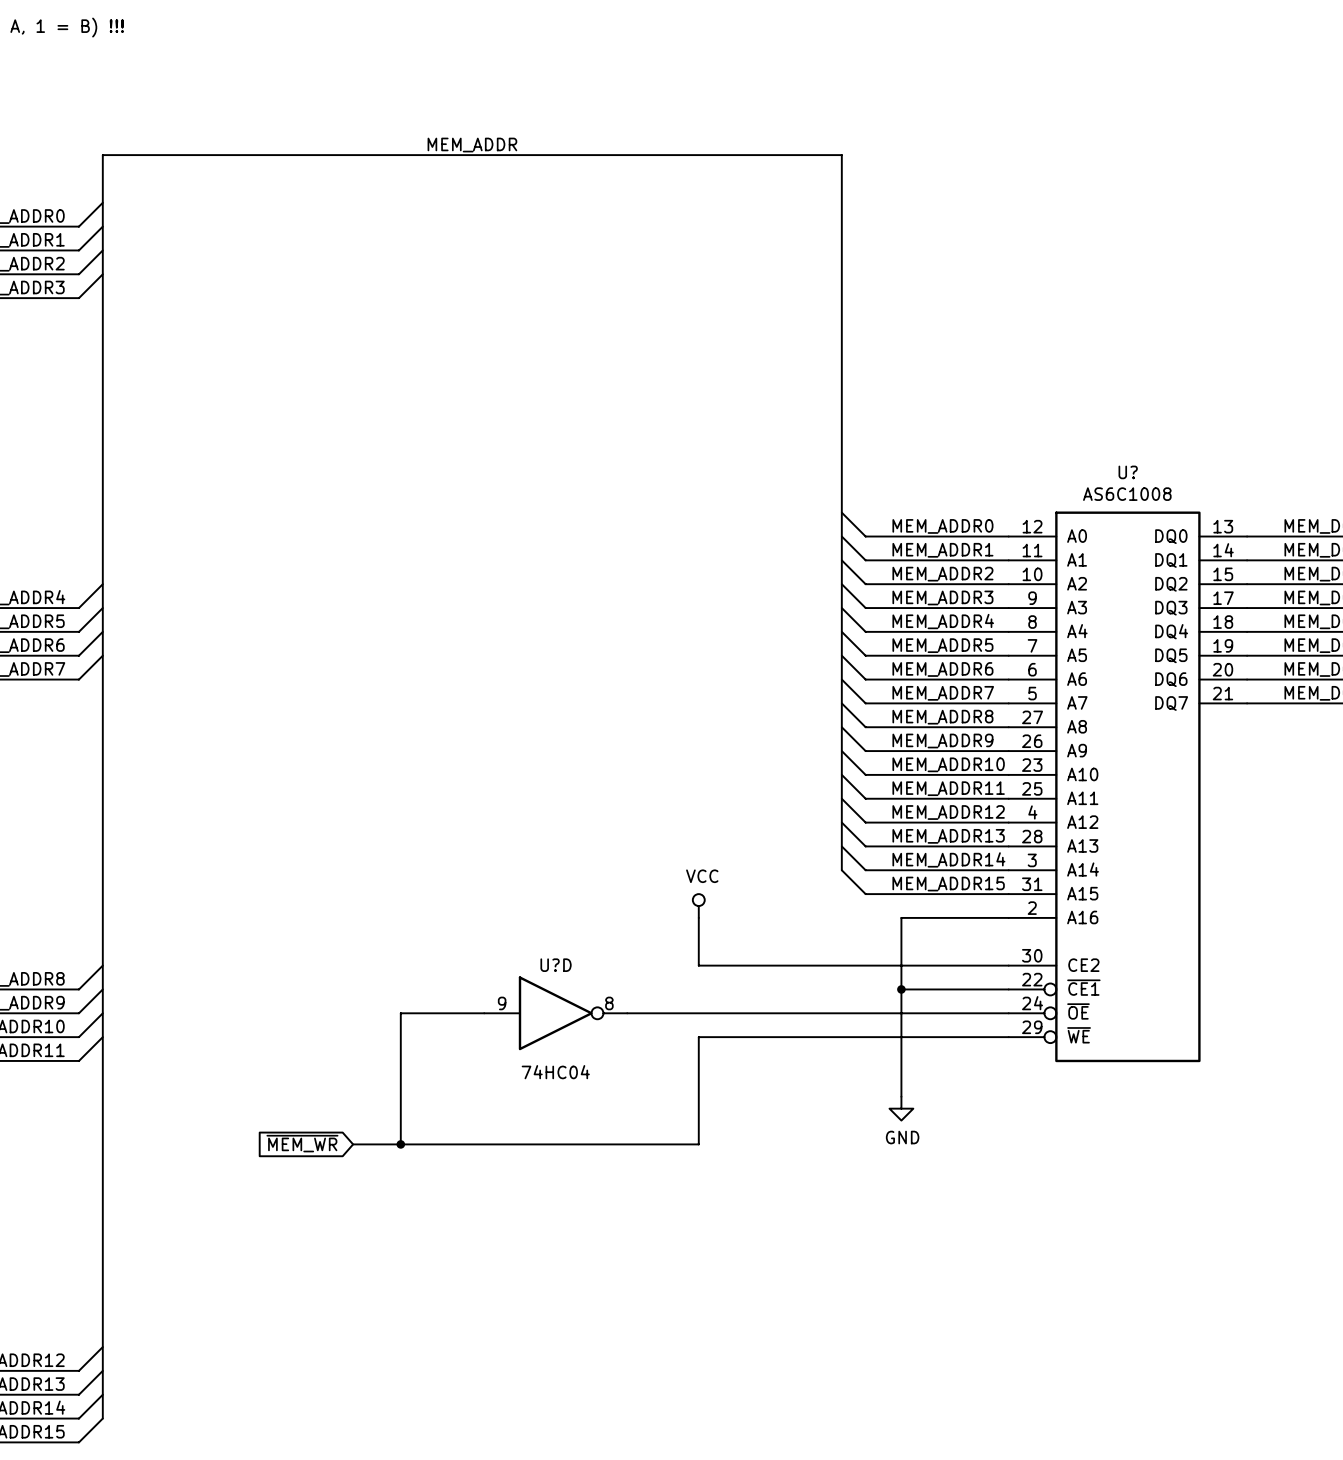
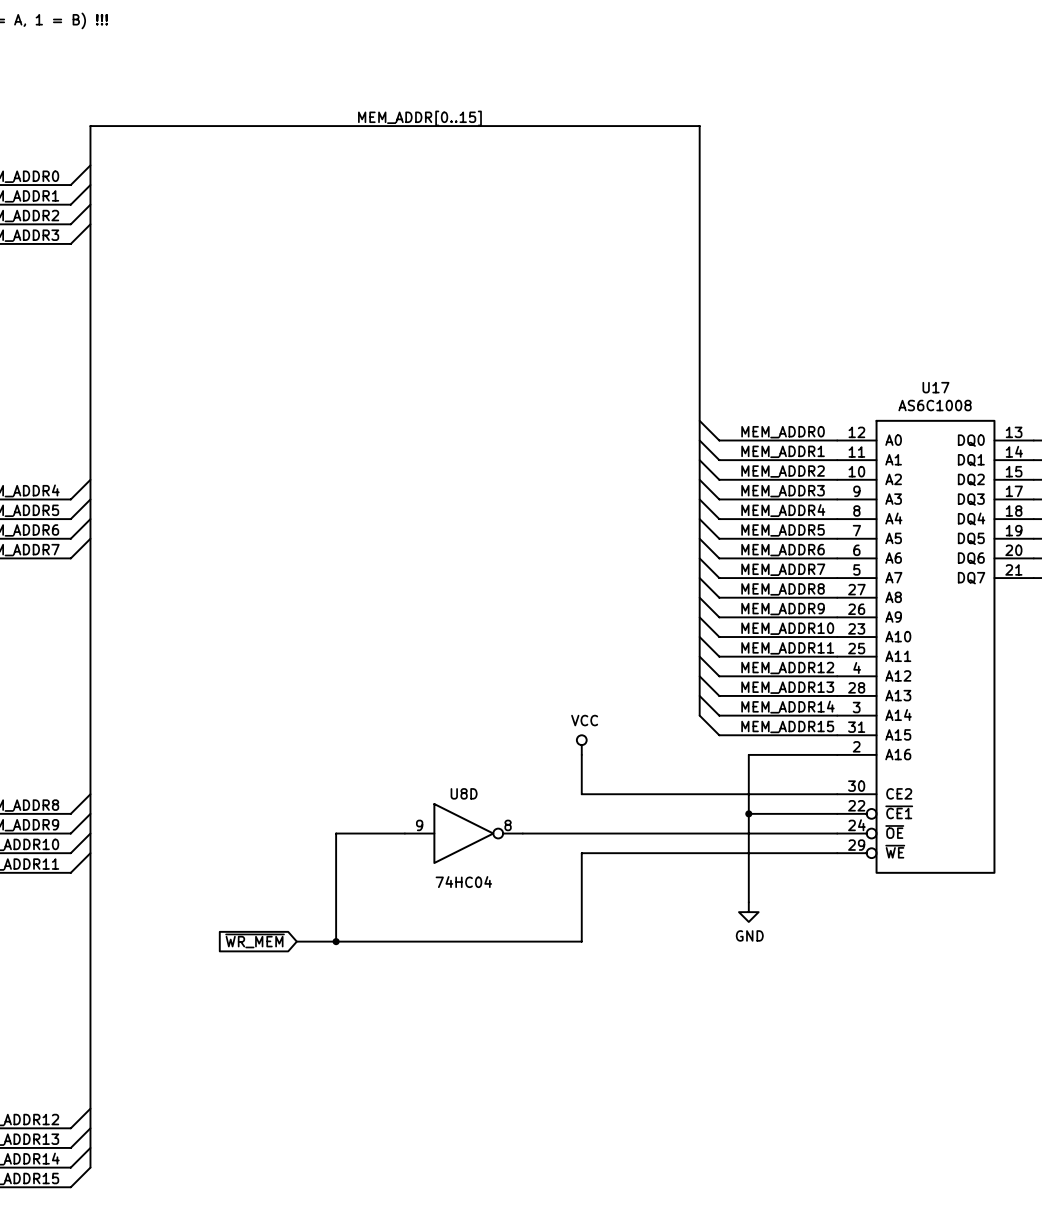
label: MEM_ADDR (472, 145) -> MEM_ADDR[0..15] (419, 118)
U? name: U? (1128, 472) -> U17 (935, 387)
U?D name: U?D (556, 965) -> U8D (464, 793)
global label: ~{MEM_WR} (302, 1143) -> ~{WR_MEM} (255, 940)

